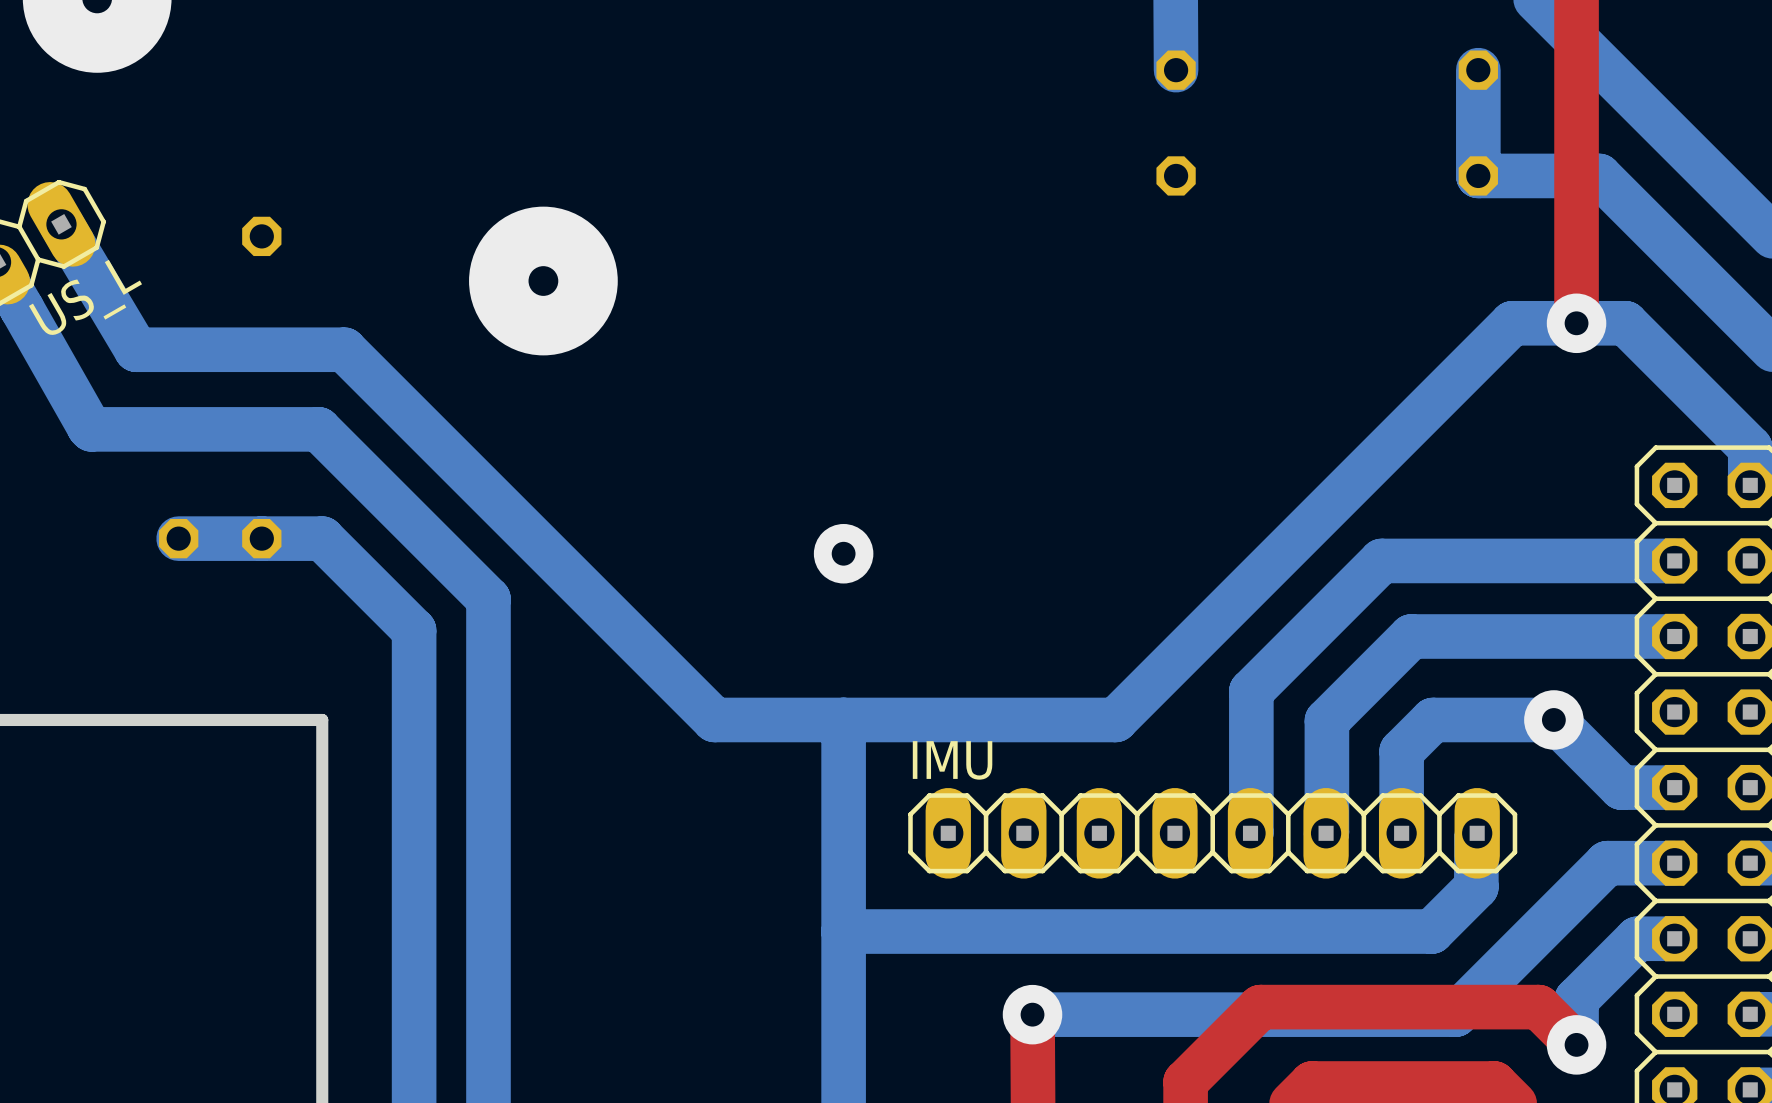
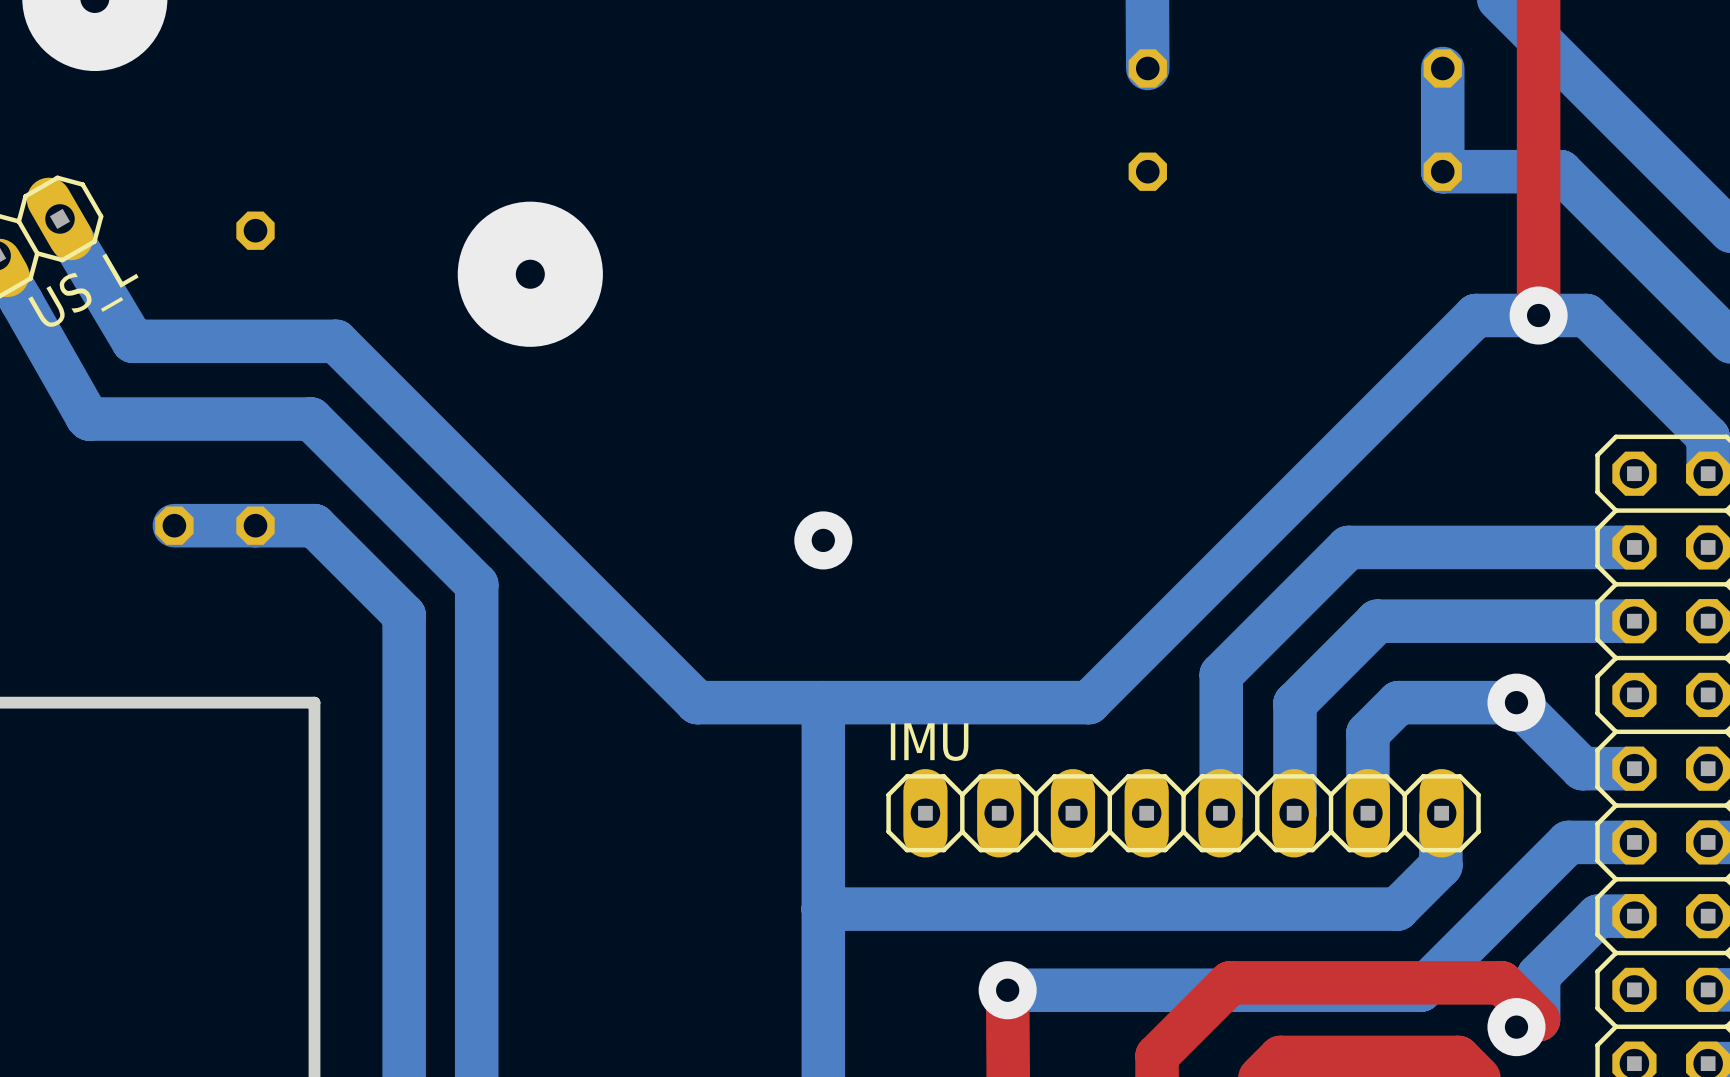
via position: (1576, 1044) -> (1516, 1027)

